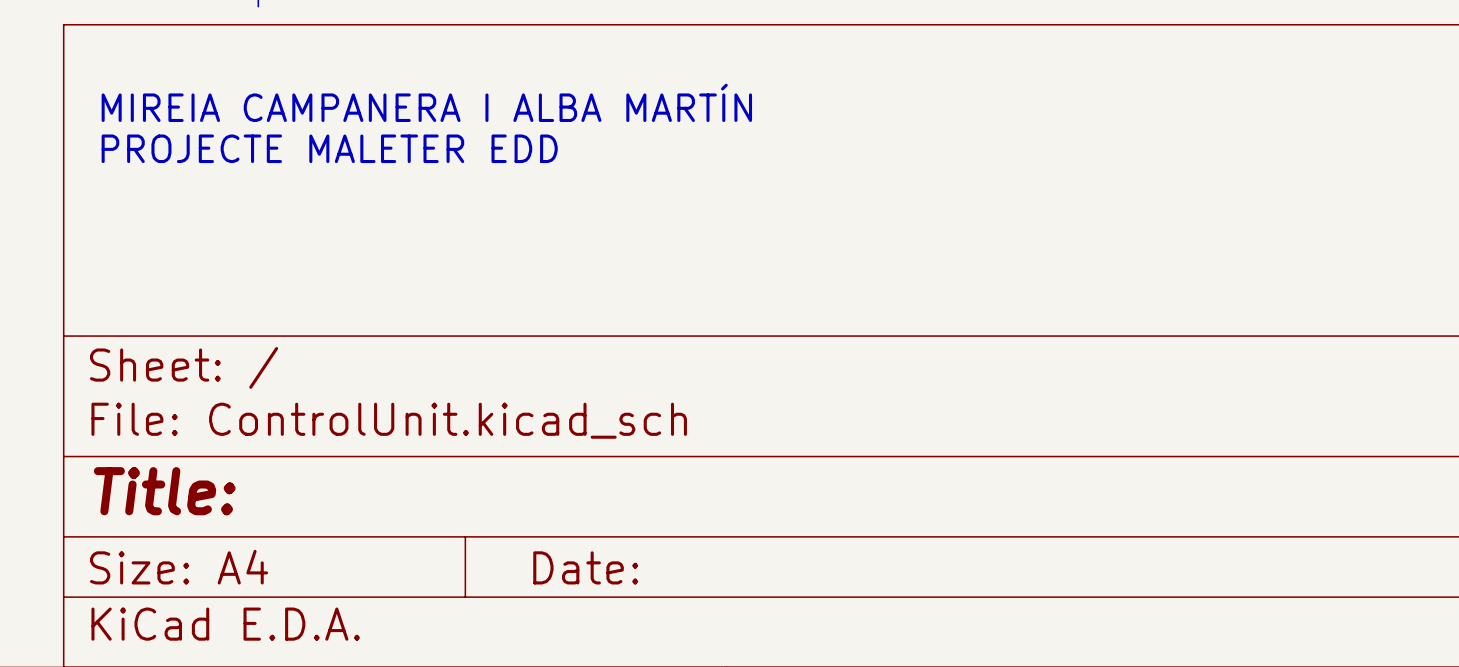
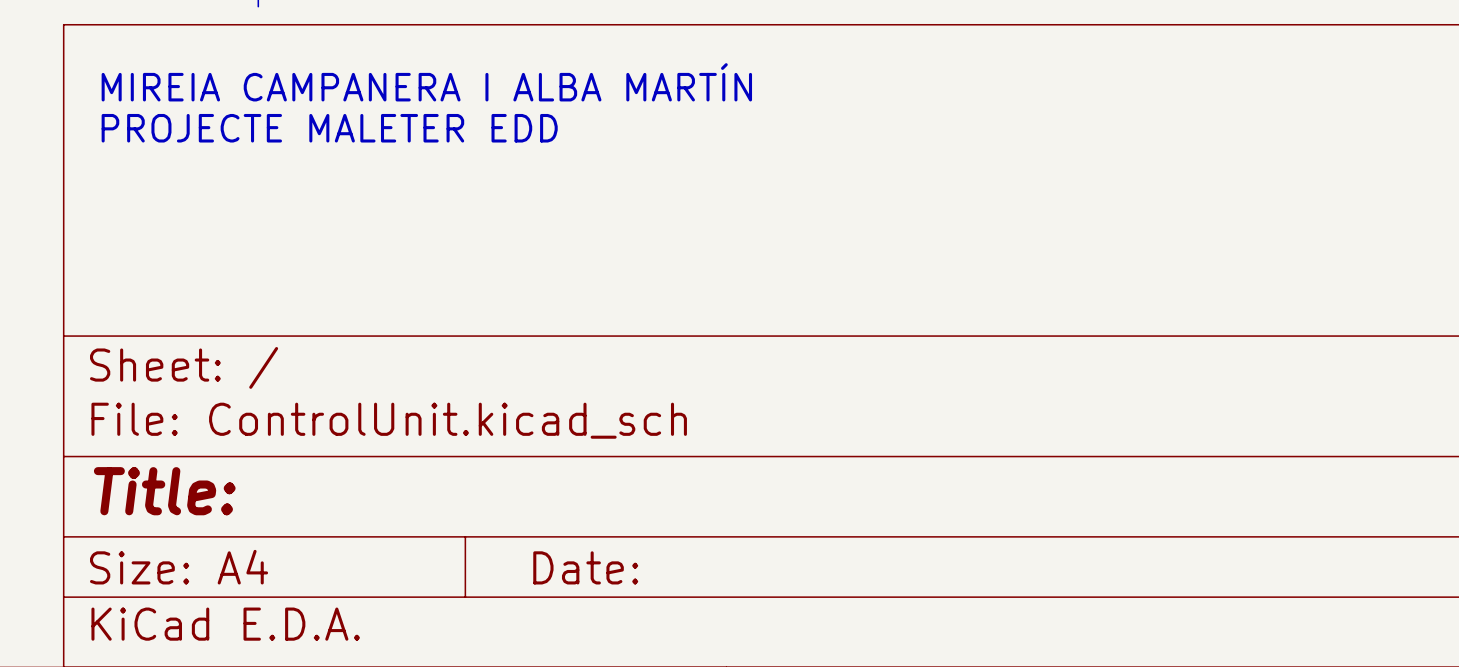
text position: MIREIA CAMPANERA I ALBA MARTÍN (426, 102) -> MIREIA CAMPANERA I ALBA MARTÍN (426, 82)
text position: PROJECTE MALETER EDD (329, 148) -> PROJECTE MALETER EDD (329, 128)

